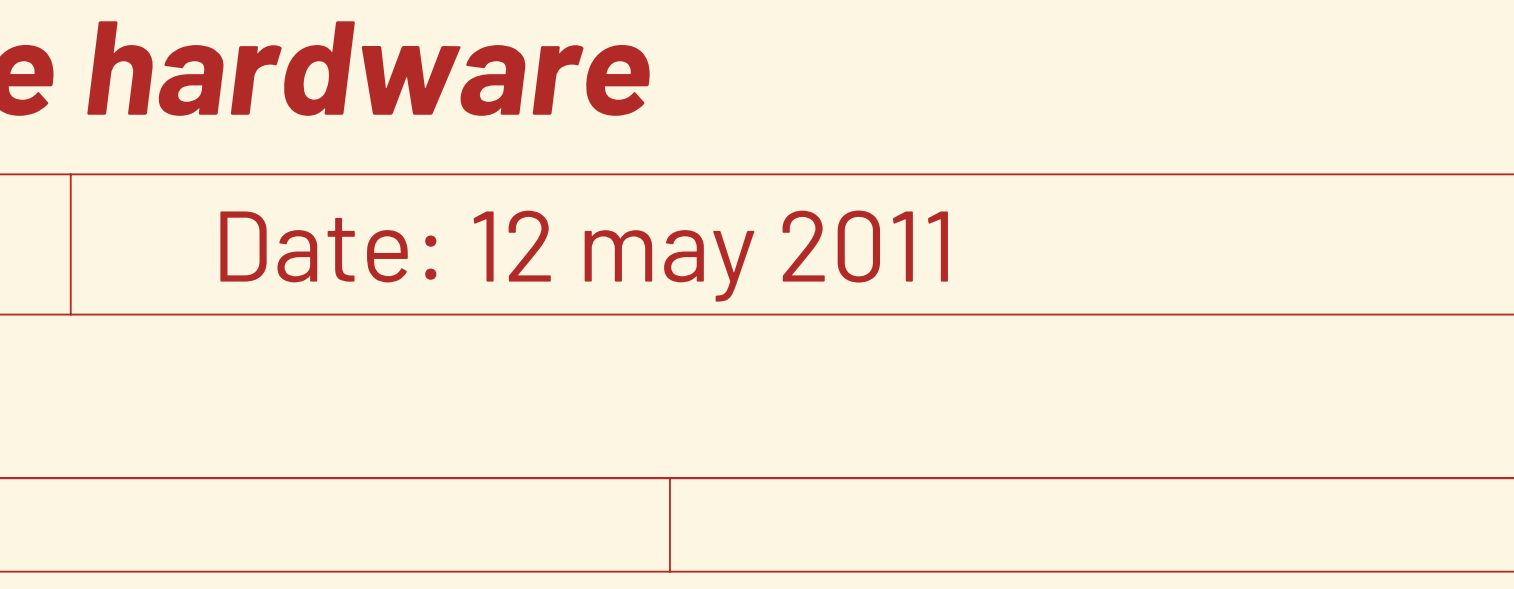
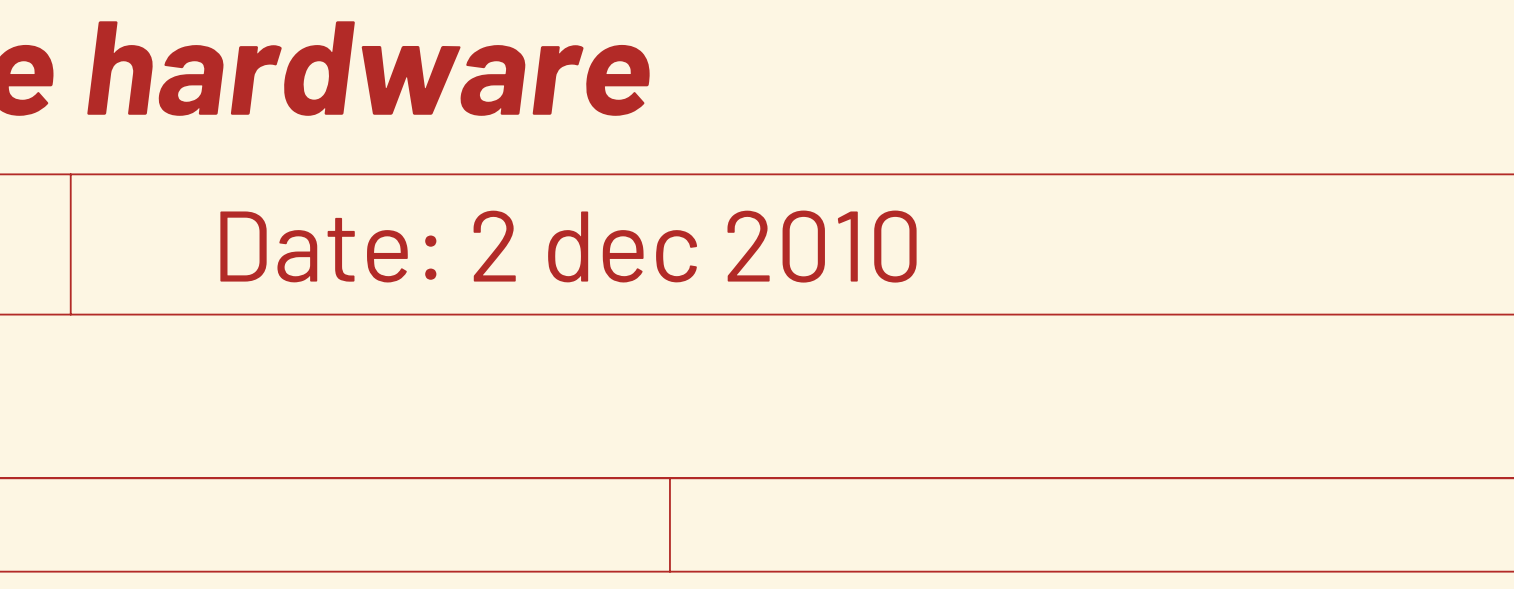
title block: Date: 12 may 2011 (584, 256) -> Date: 2 dec 2010 (568, 246)

